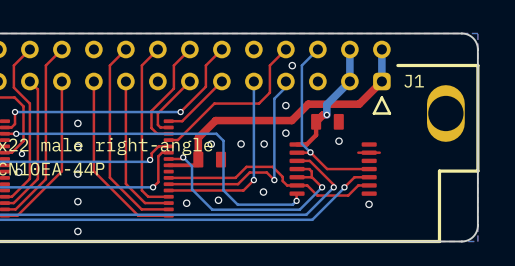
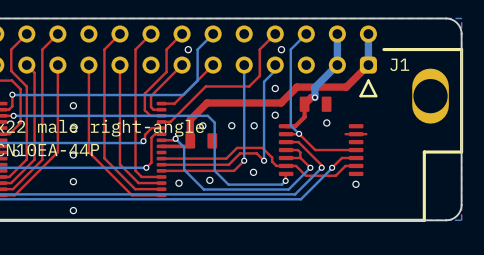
top track: (221, 49) (205, 65) (205, 86) (180, 112) -> none
via: none -> (188, 49)
bottom track: (180, 112) (15, 112) -> (213, 34) (197, 49) (197, 80) (183, 95) (12, 95)
via: (180, 112) -> none
via: (21, 153) -> none

